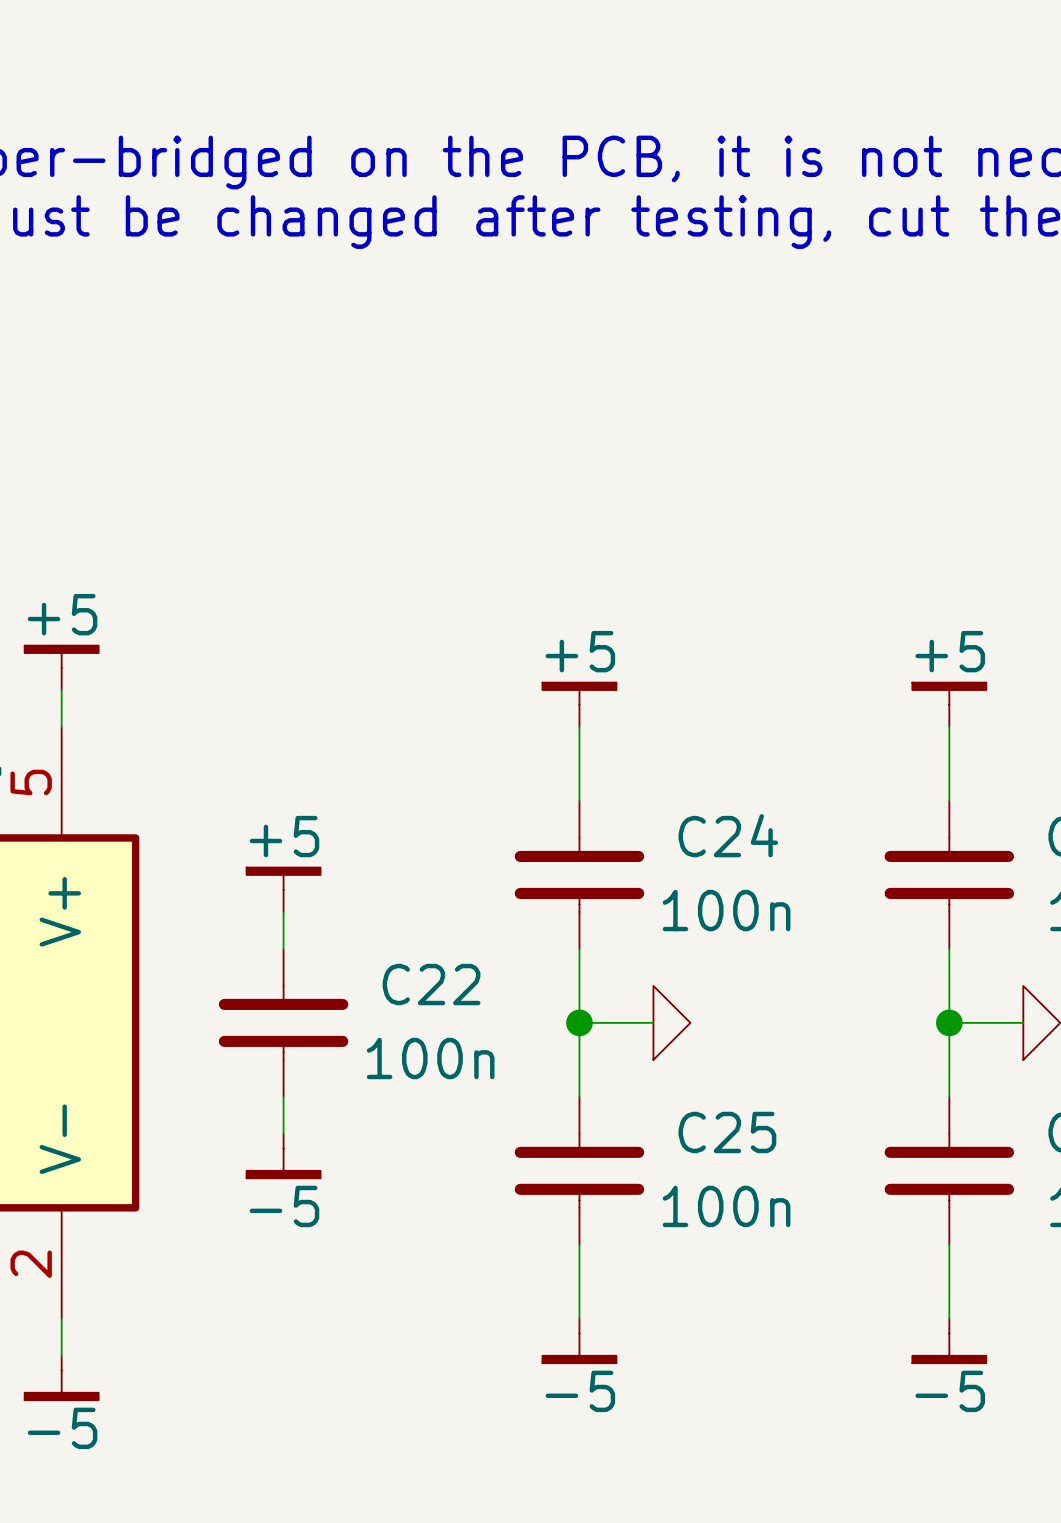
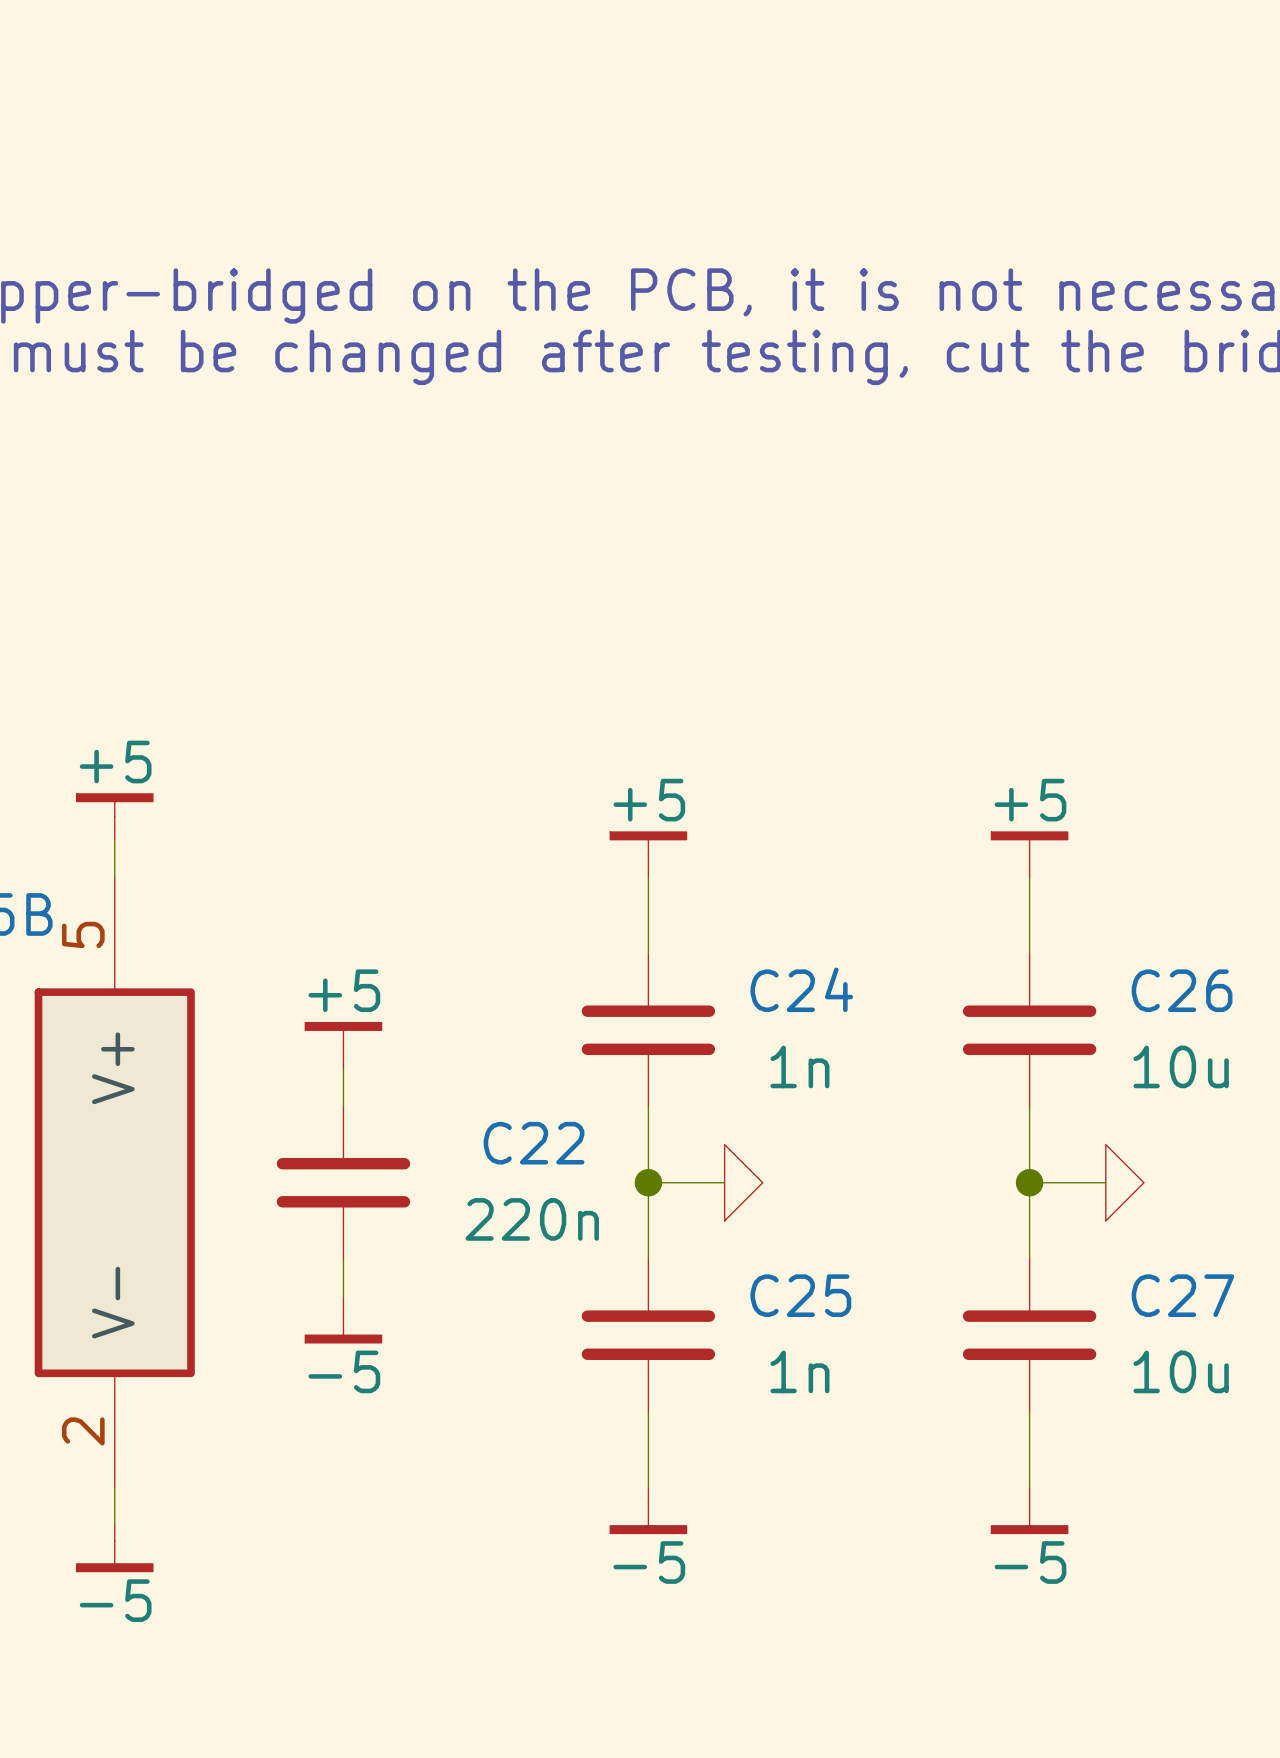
C24 value: 100n (726, 910) -> 1n (799, 1066)
C22 name position: C22 (431, 984) -> C22 (534, 1143)
C22 value: 100n (430, 1058) -> 220n (532, 1219)
C25 value: 100n (726, 1206) -> 1n (799, 1371)

